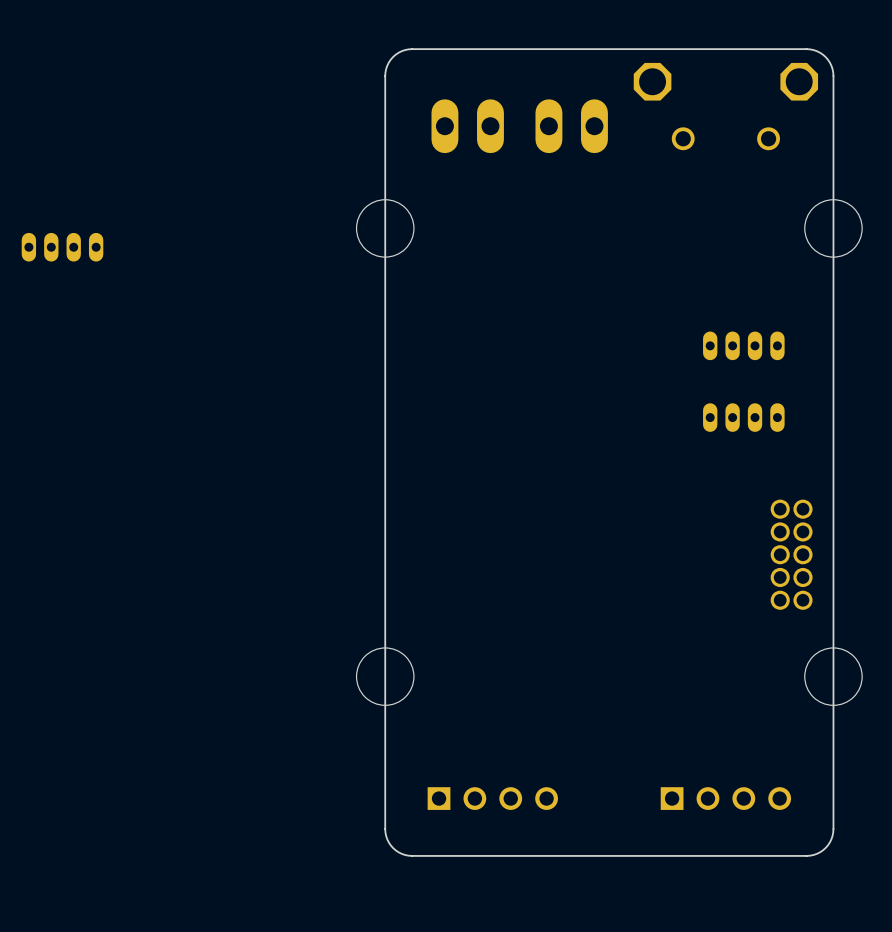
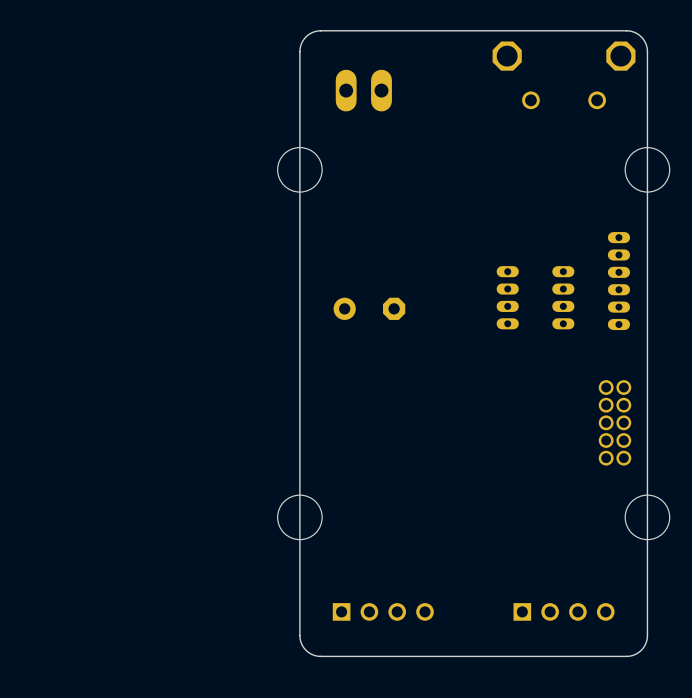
part: (571, 126) -> none
part: (62, 247) -> none
part: (743, 345) -> none
part: none -> (618, 281)
part: none -> (507, 297)
part: none -> (563, 297)
part: none -> (369, 308)
part: (743, 417) -> none

